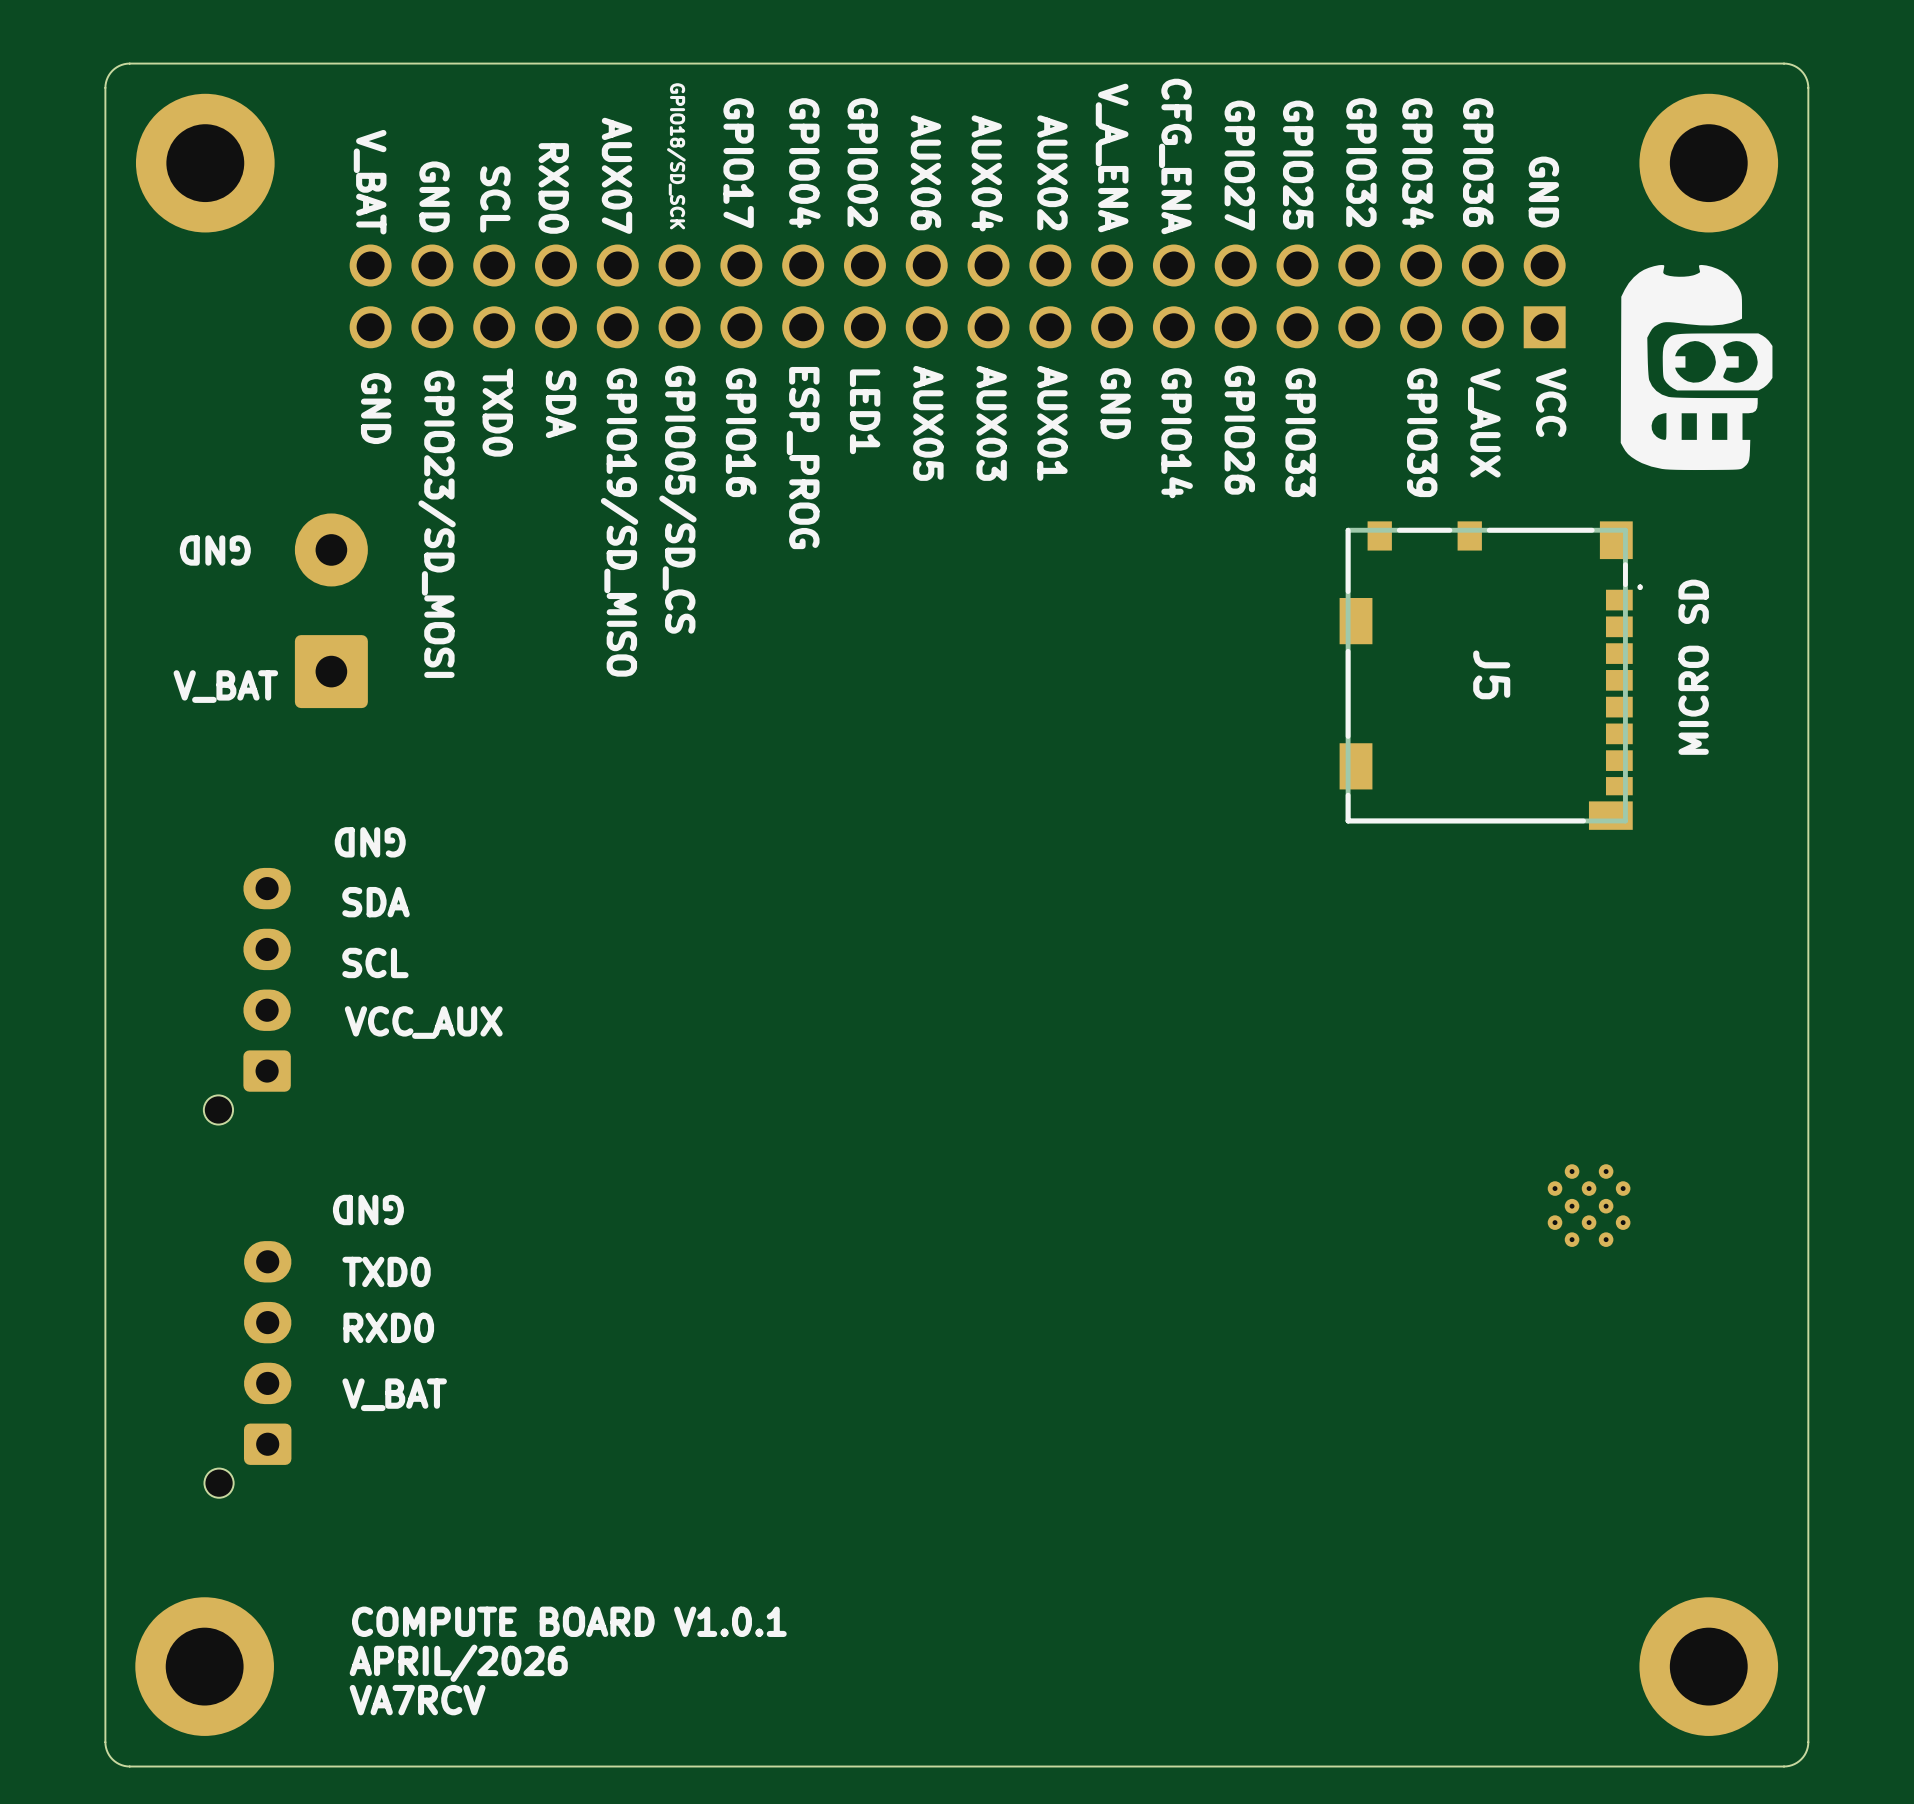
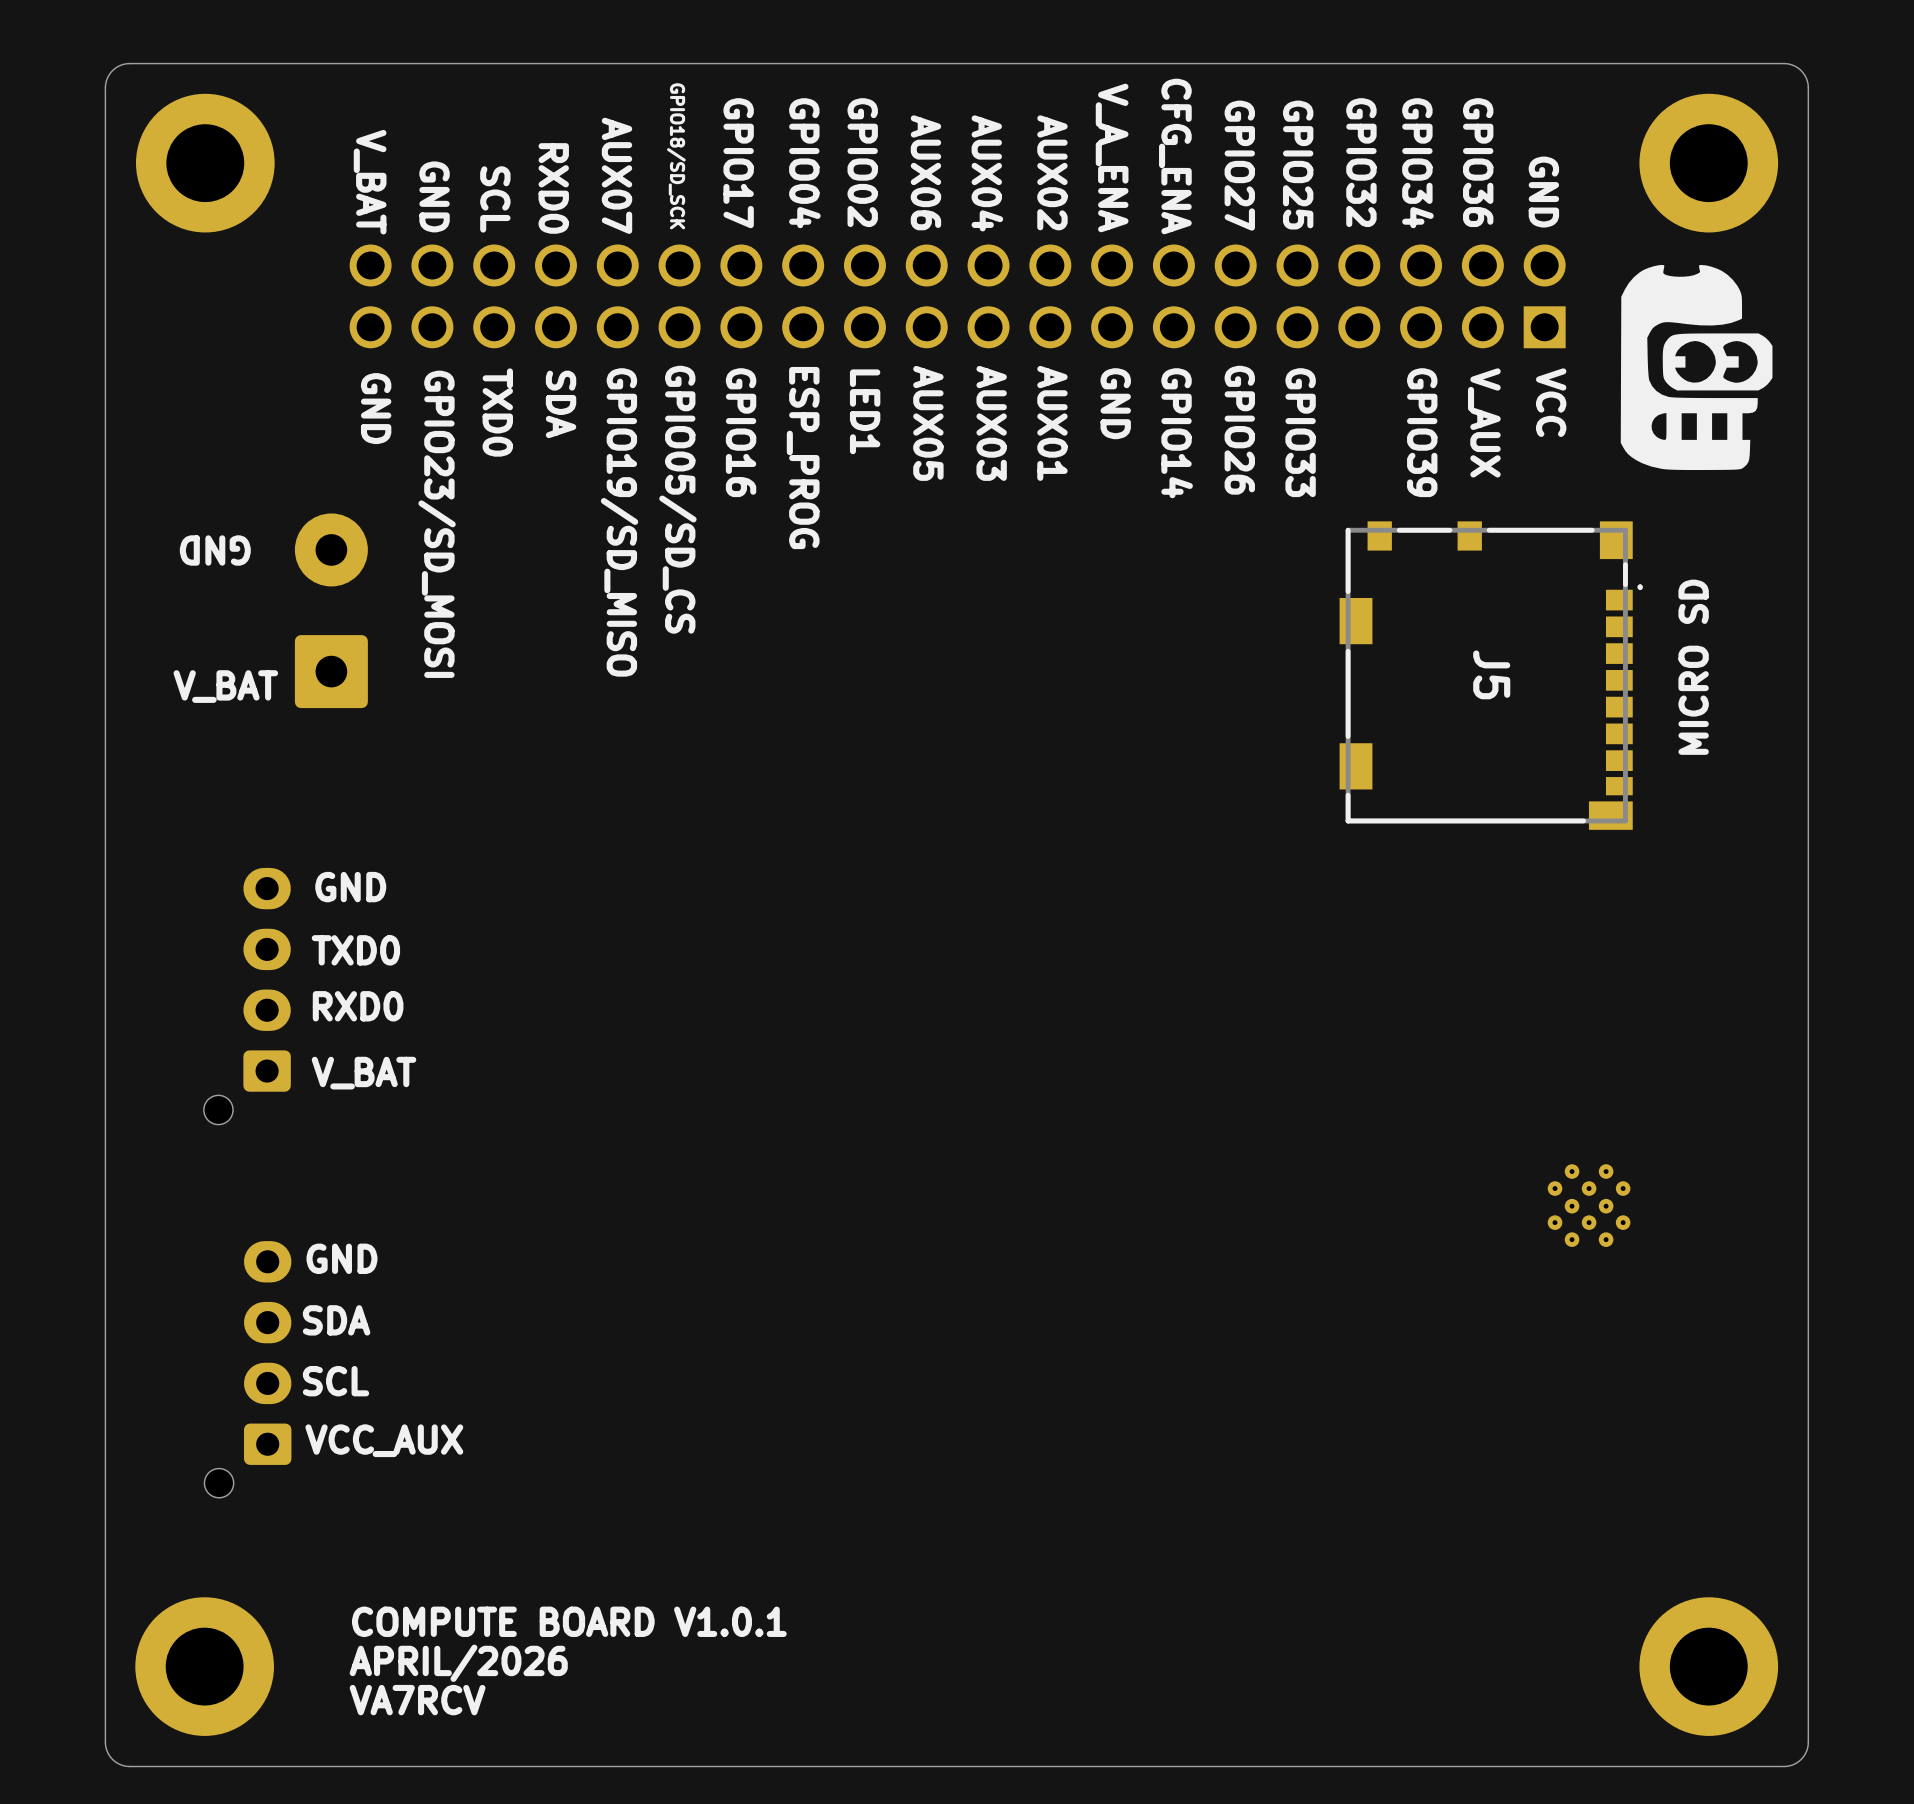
text rotation: 0° (370, 842) -> 180° (350, 887)
text position: SDA (376, 902) -> SDA (336, 1320)
text position: SCL (375, 962) -> SCL (336, 1381)
text position: VCC_AUX (423, 1022) -> VCC_AUX (384, 1440)
text rotation: 0° (368, 1210) -> 180° (341, 1258)
text position: TXD0 (386, 1271) -> TXD0 (355, 950)
text position: RXD0 (388, 1327) -> RXD0 (358, 1006)
text position: V_BAT (394, 1394) -> V_BAT (364, 1073)

